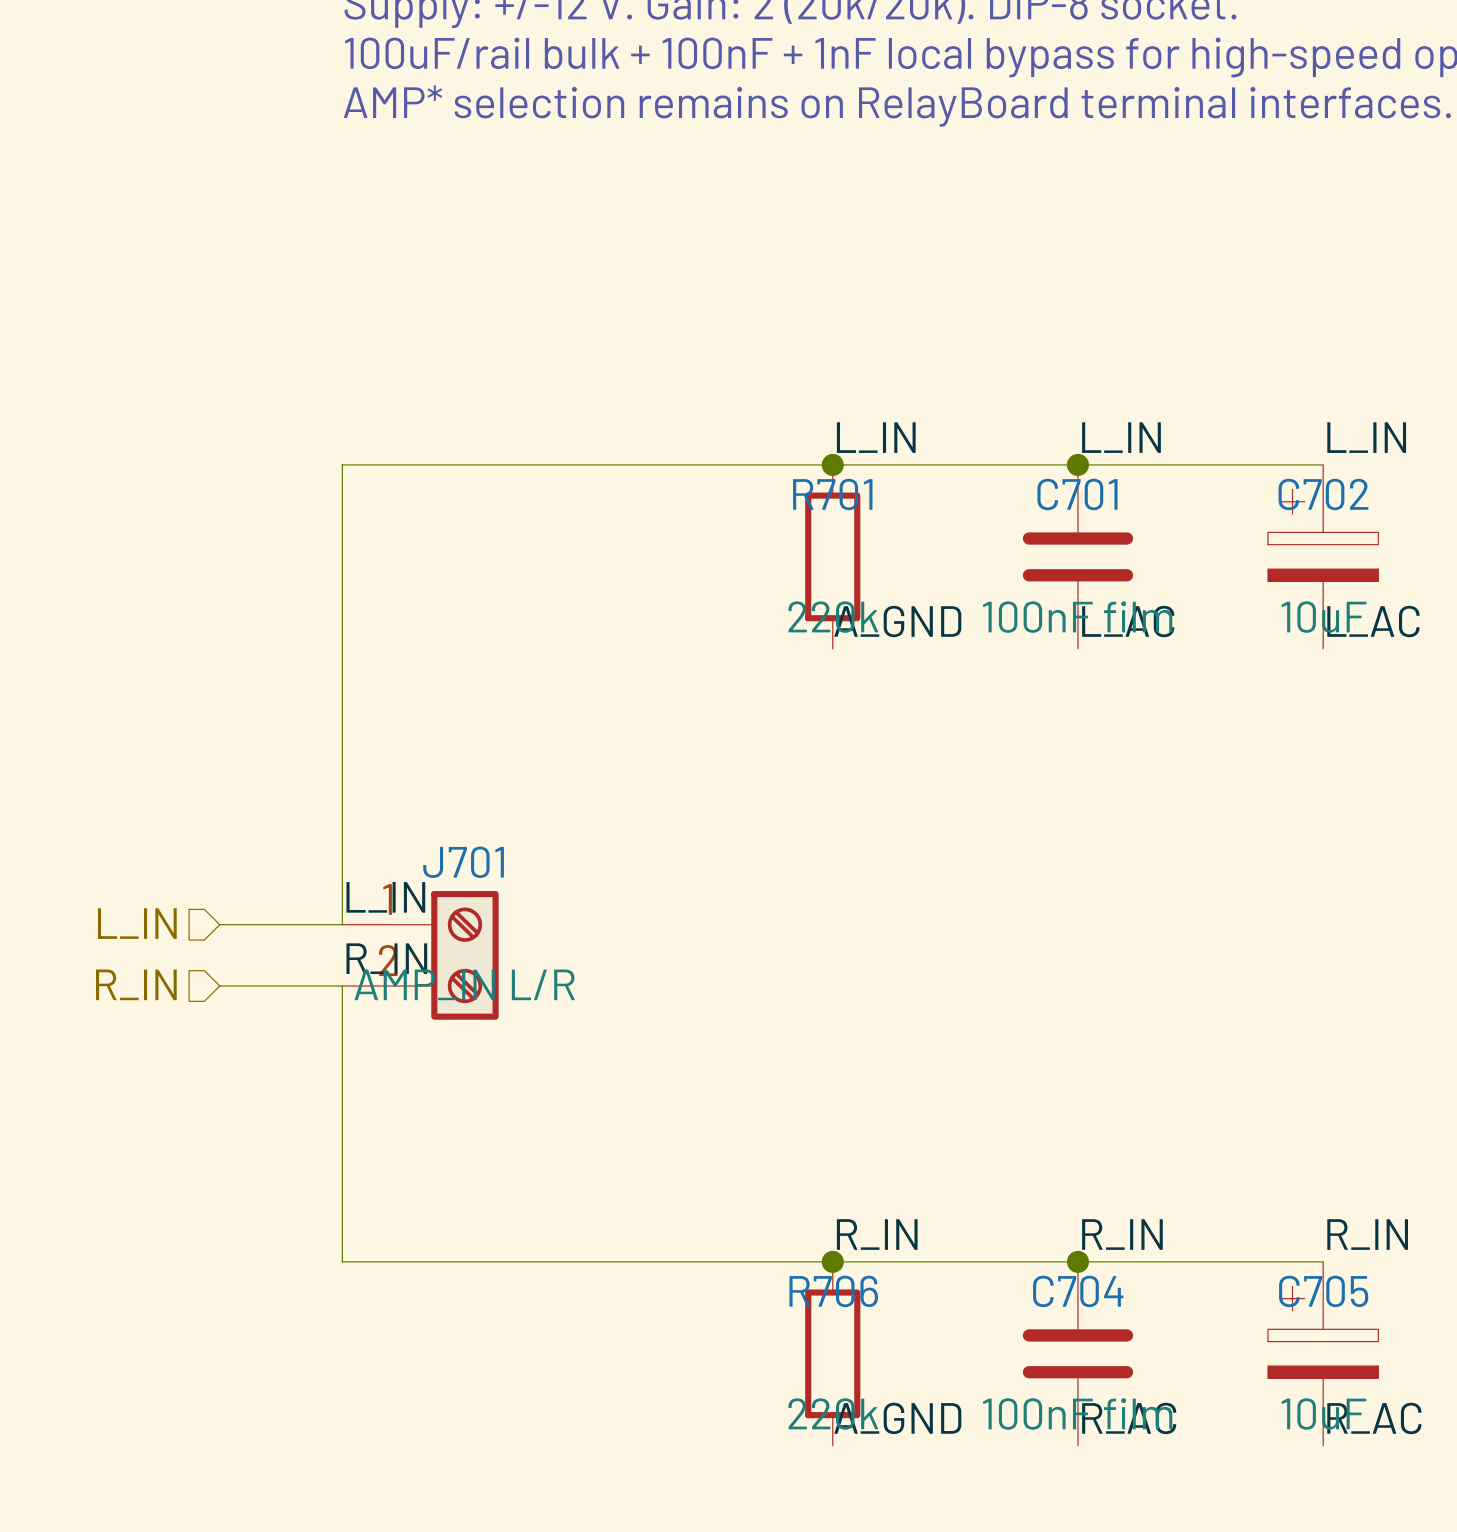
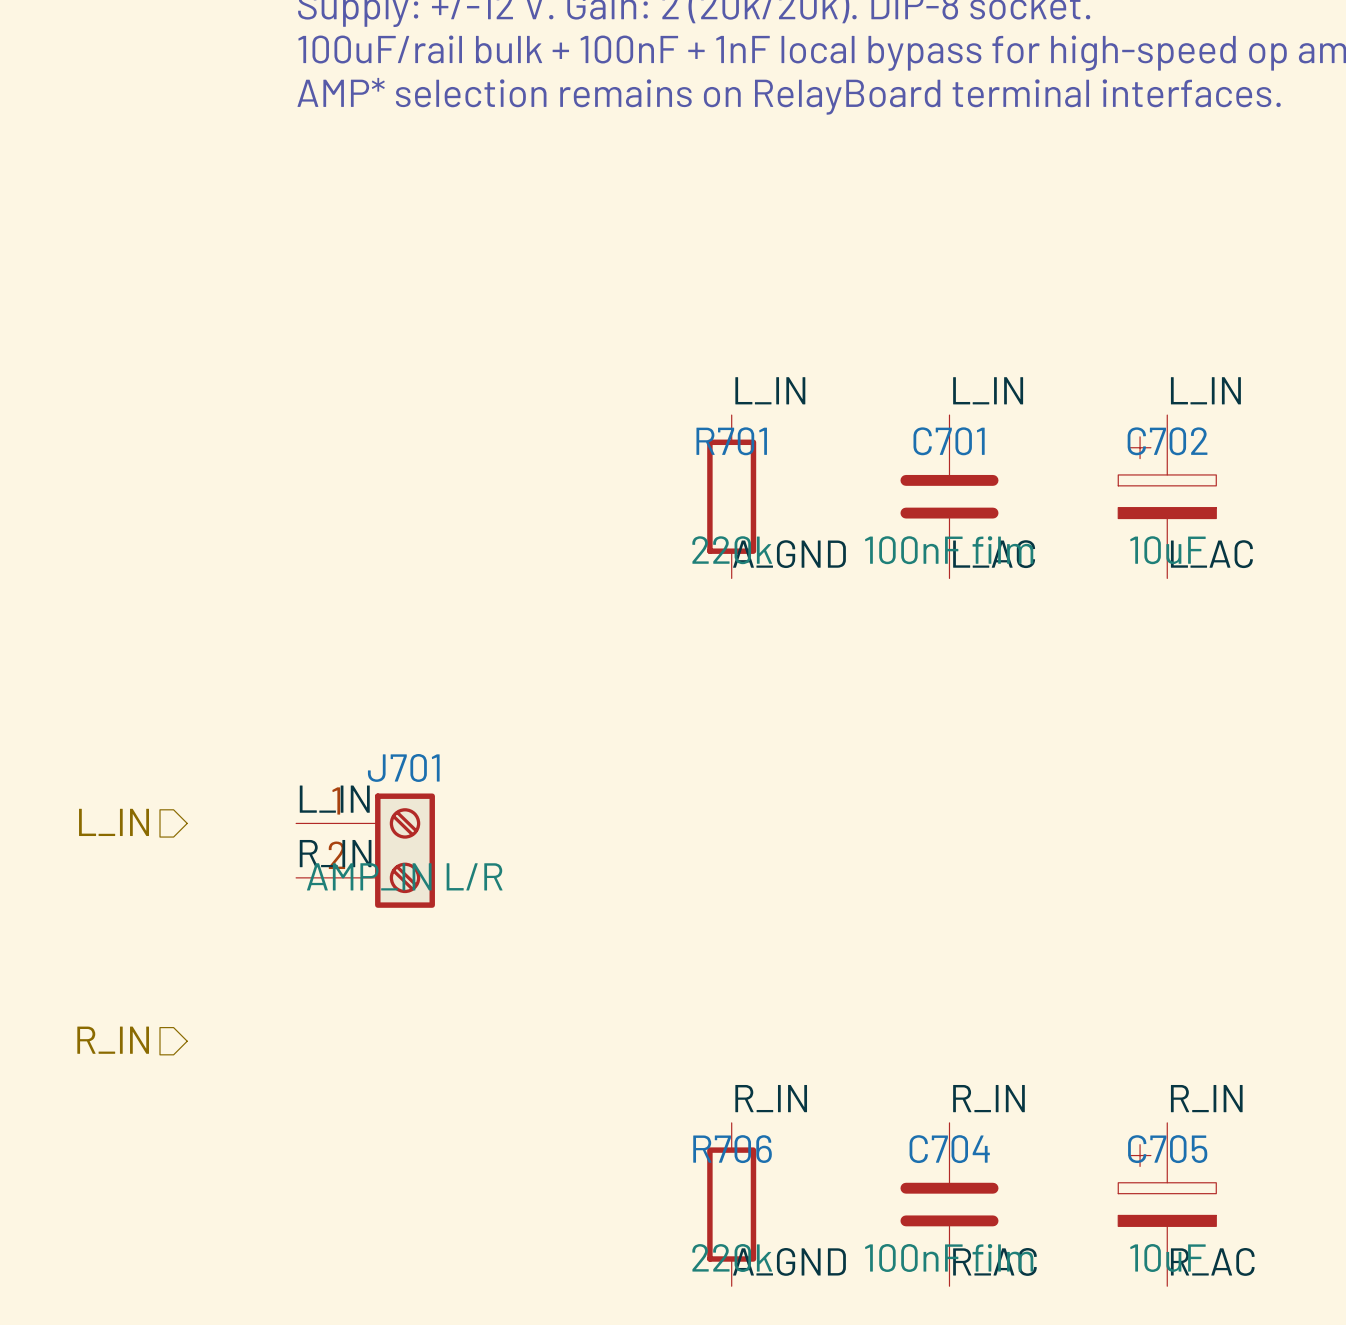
junction: (832, 464) -> none
junction: (1077, 464) -> none
wire: (1323, 464) (342, 464) (342, 924) (219, 924) -> none
hierarchical label position: R_IN (136, 984) -> R_IN (113, 1040)
wire: (219, 986) (342, 986) (342, 1261) (1323, 1261) -> none
junction: (832, 1261) -> none
junction: (1077, 1261) -> none

